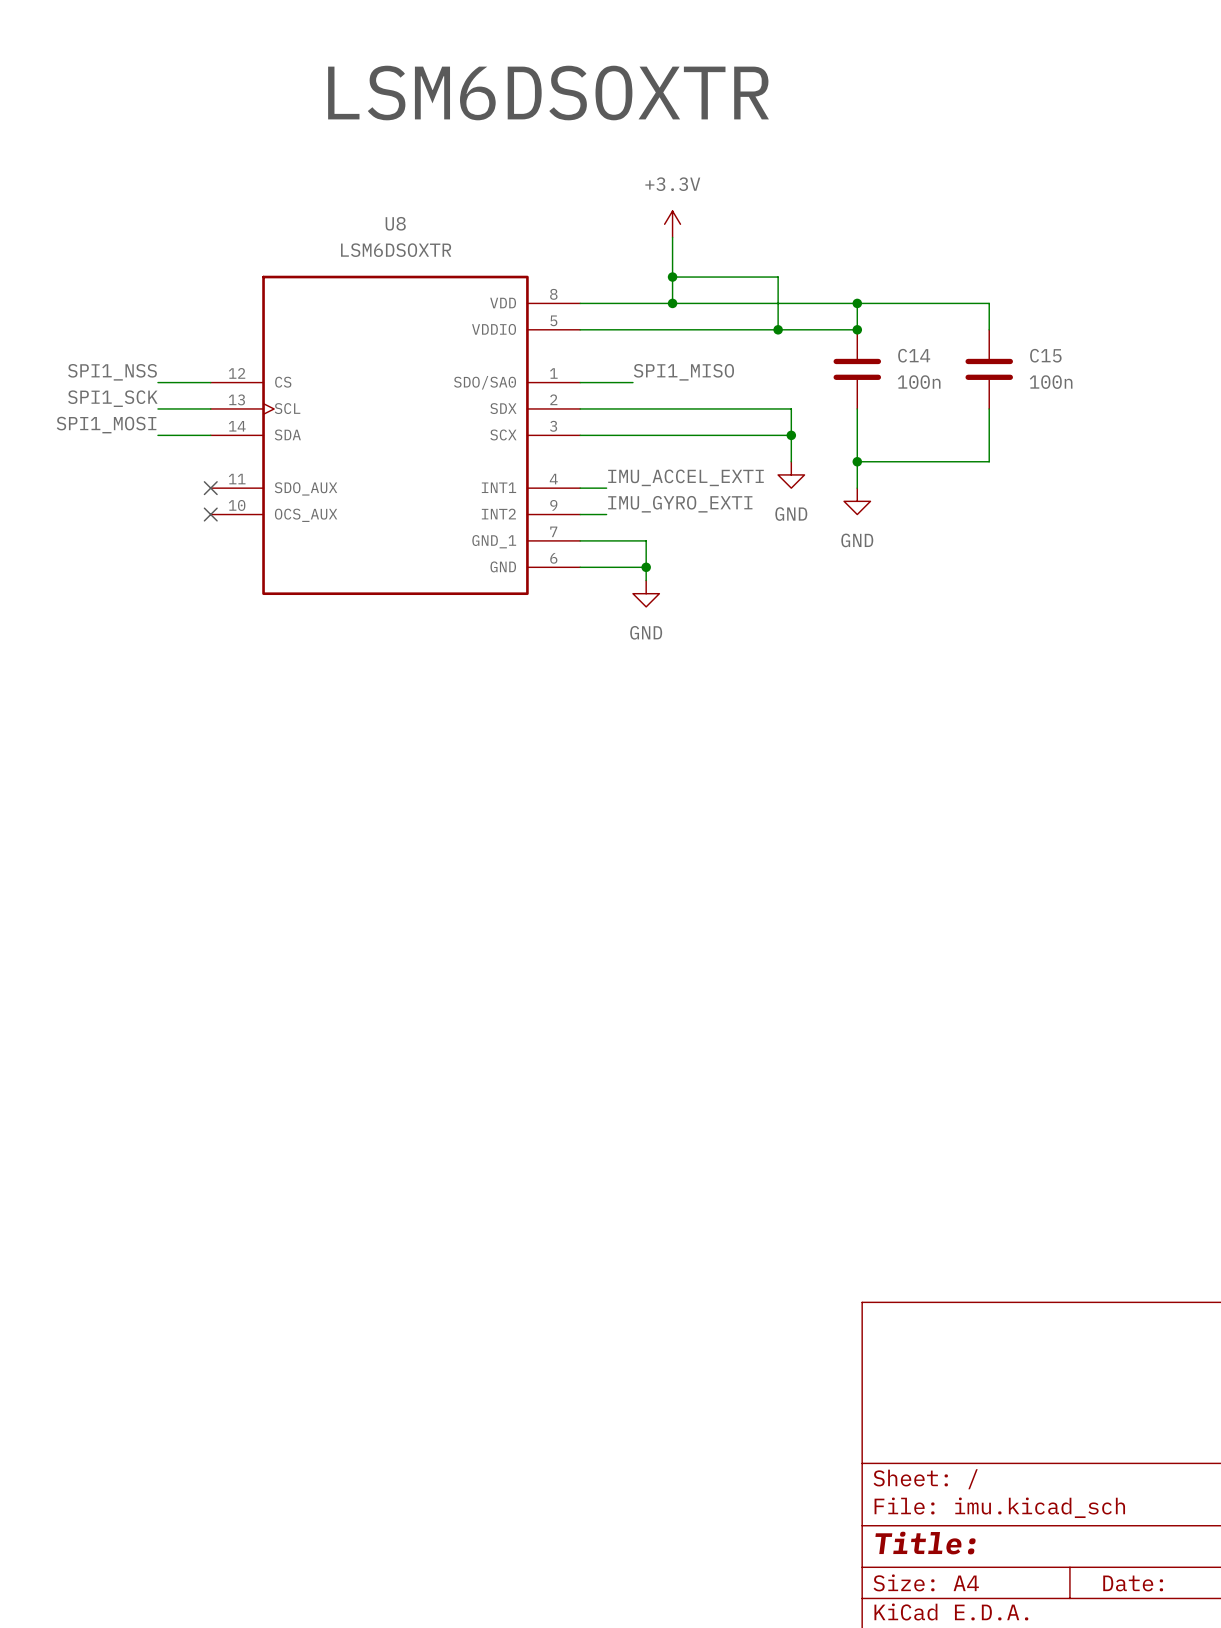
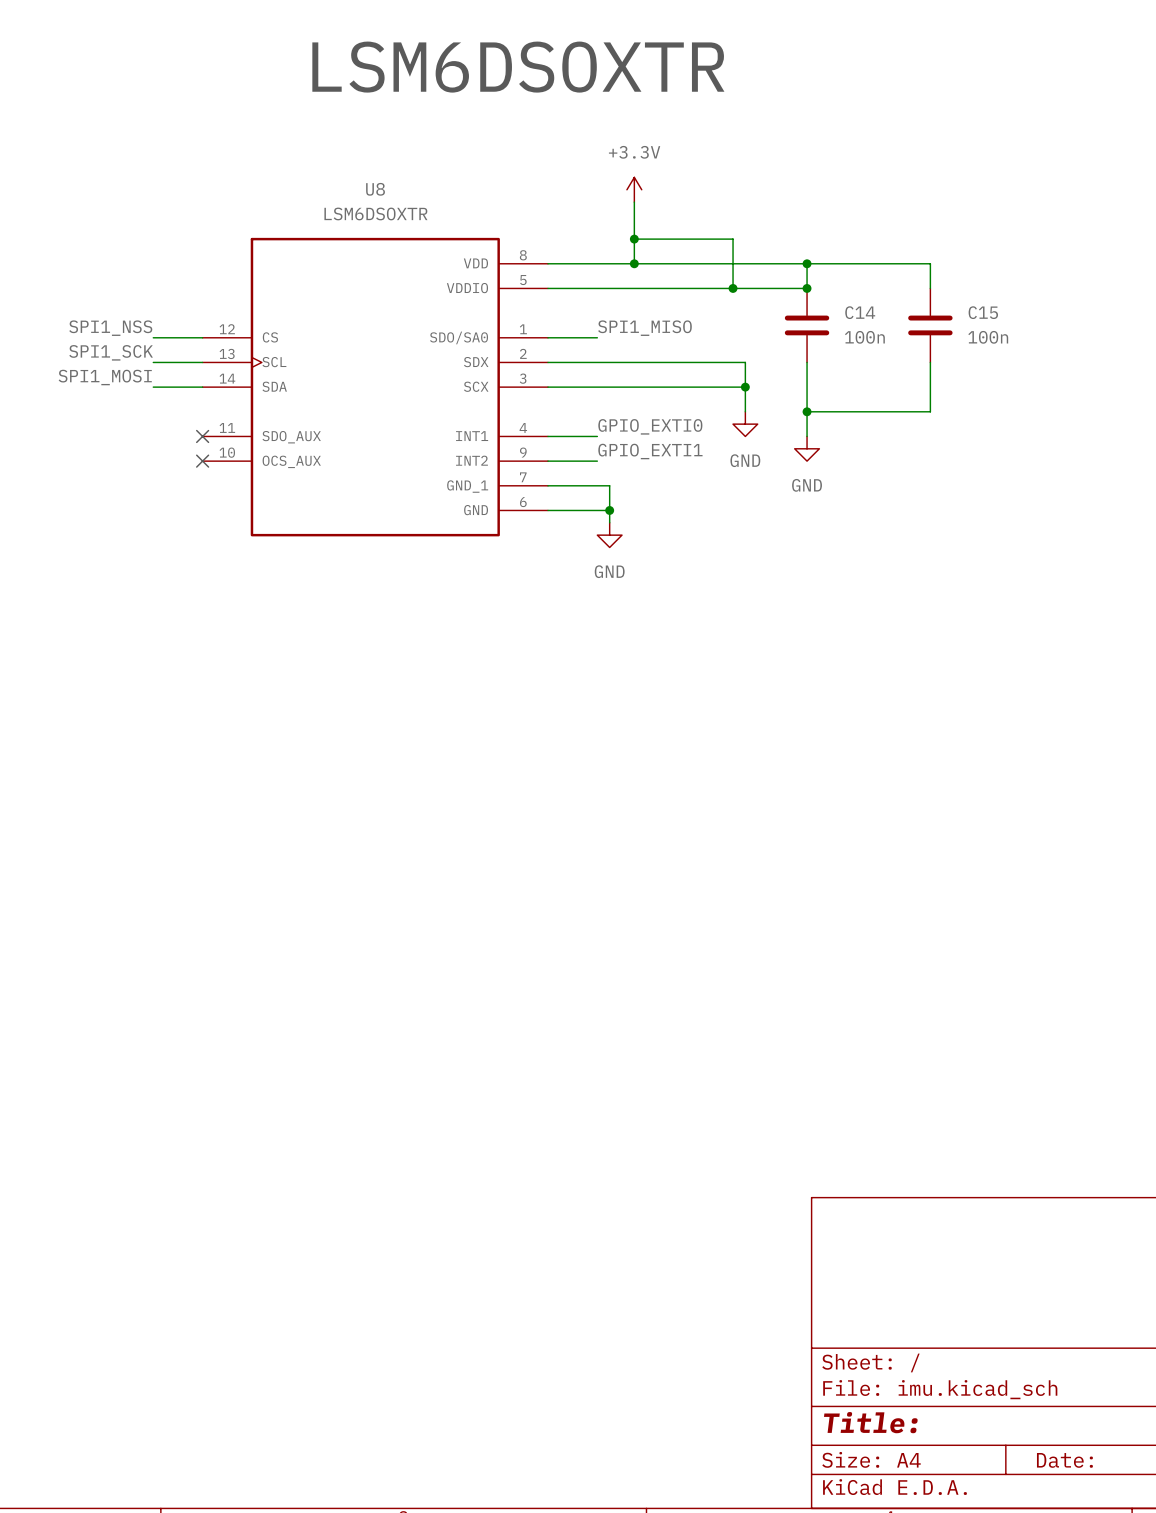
label: IMU_ACCEL_EXTI (685, 477) -> none
label: none -> GPIO_EXTI0 (650, 426)
wire: none -> (572, 436) (597, 436)
label: IMU_GYRO_EXTI (680, 504) -> none
label: none -> GPIO_EXTI1 (650, 451)
wire: none -> (572, 461) (597, 461)

